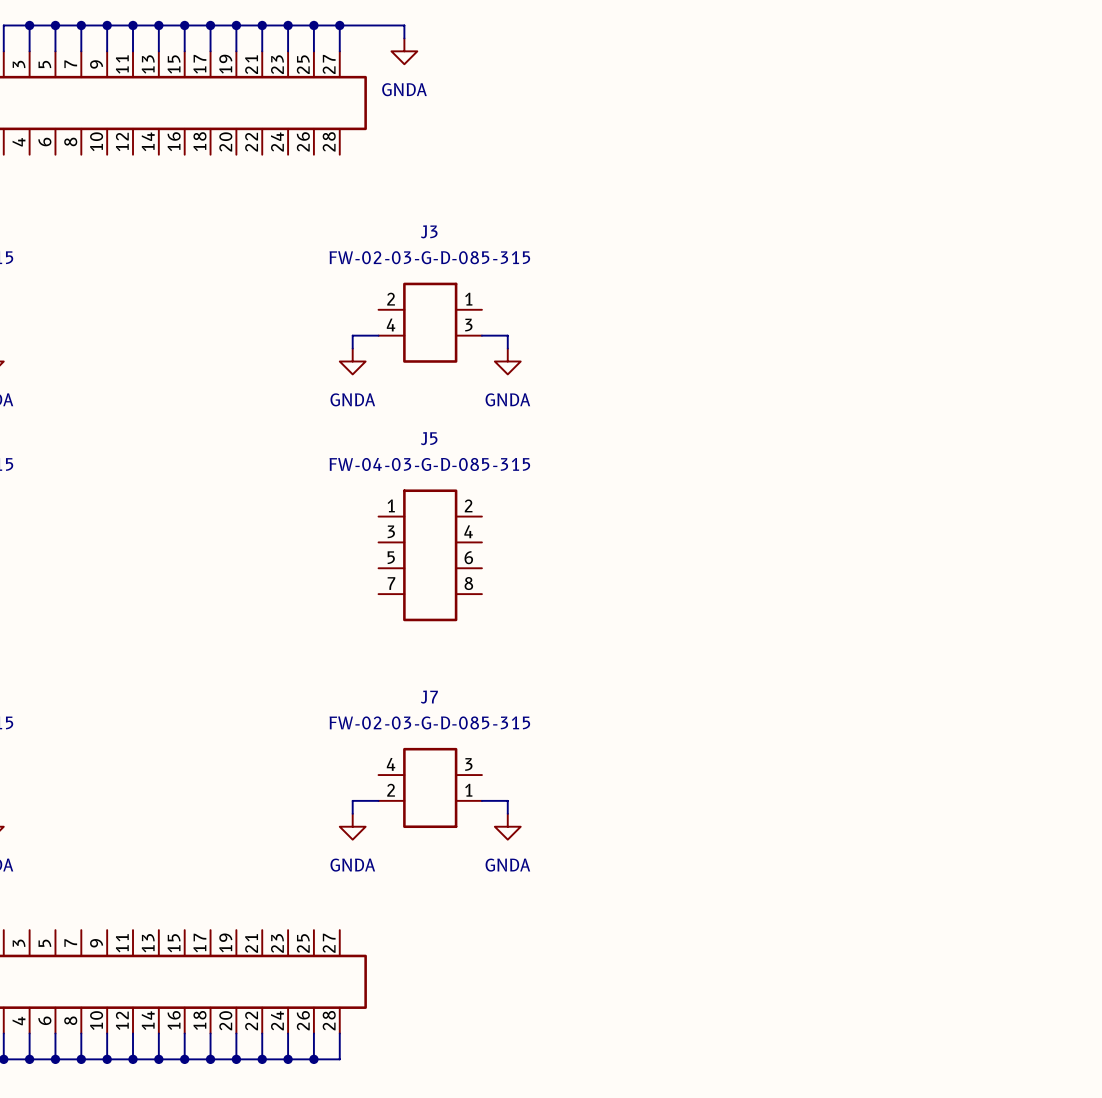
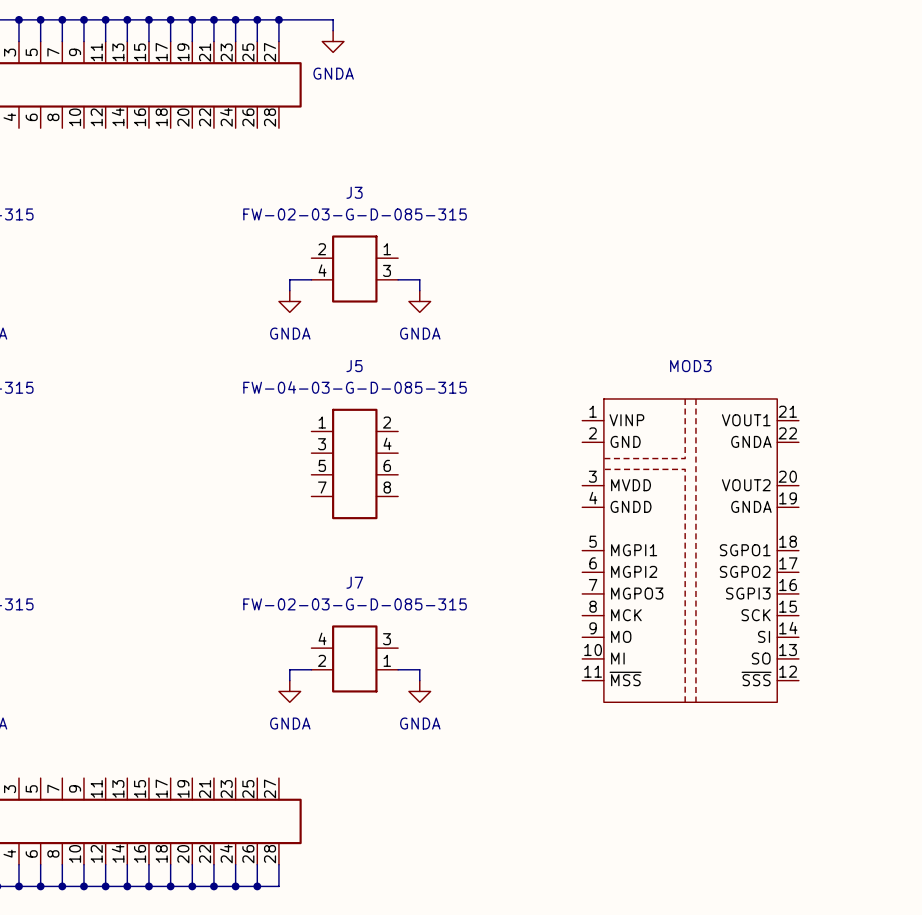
MOD3: none -> (690, 550)

